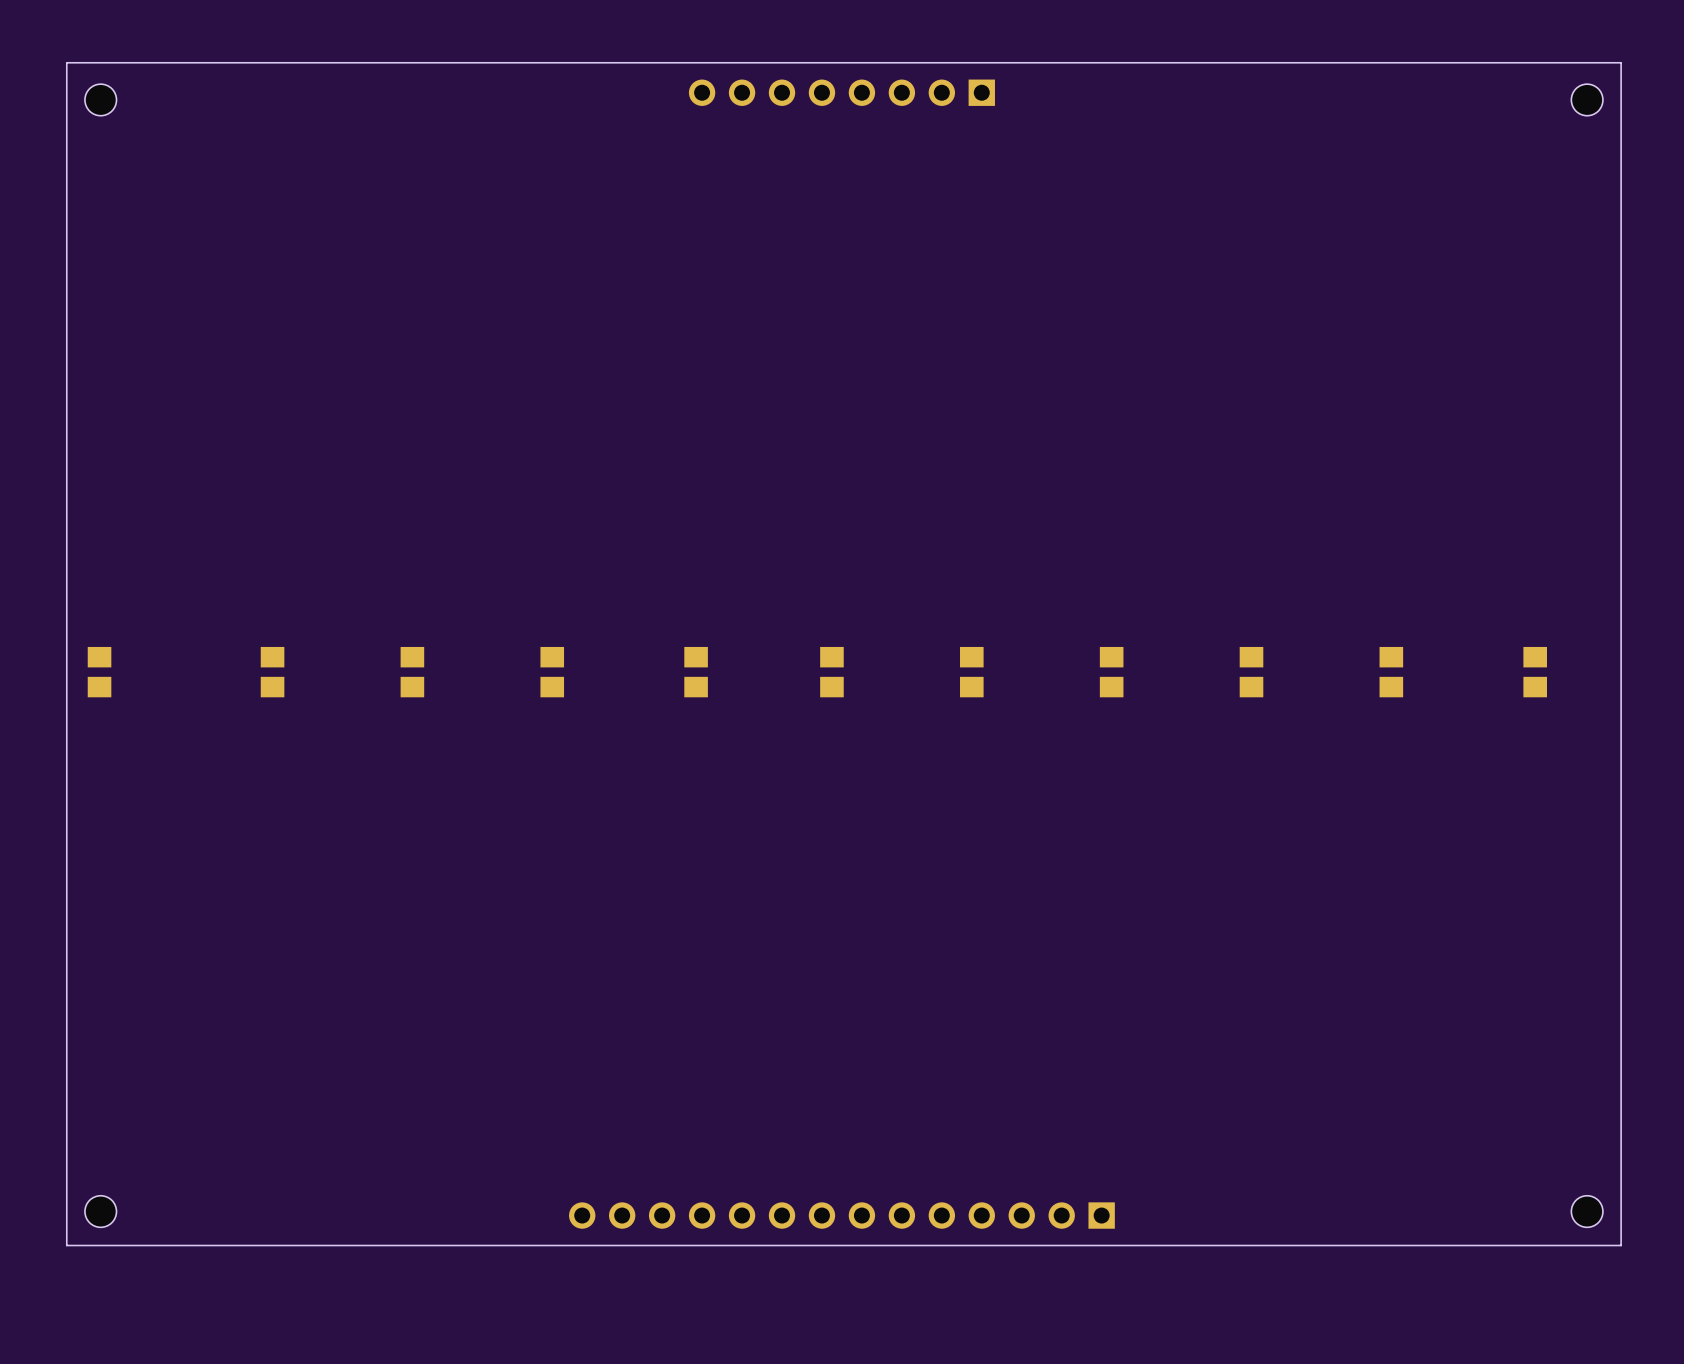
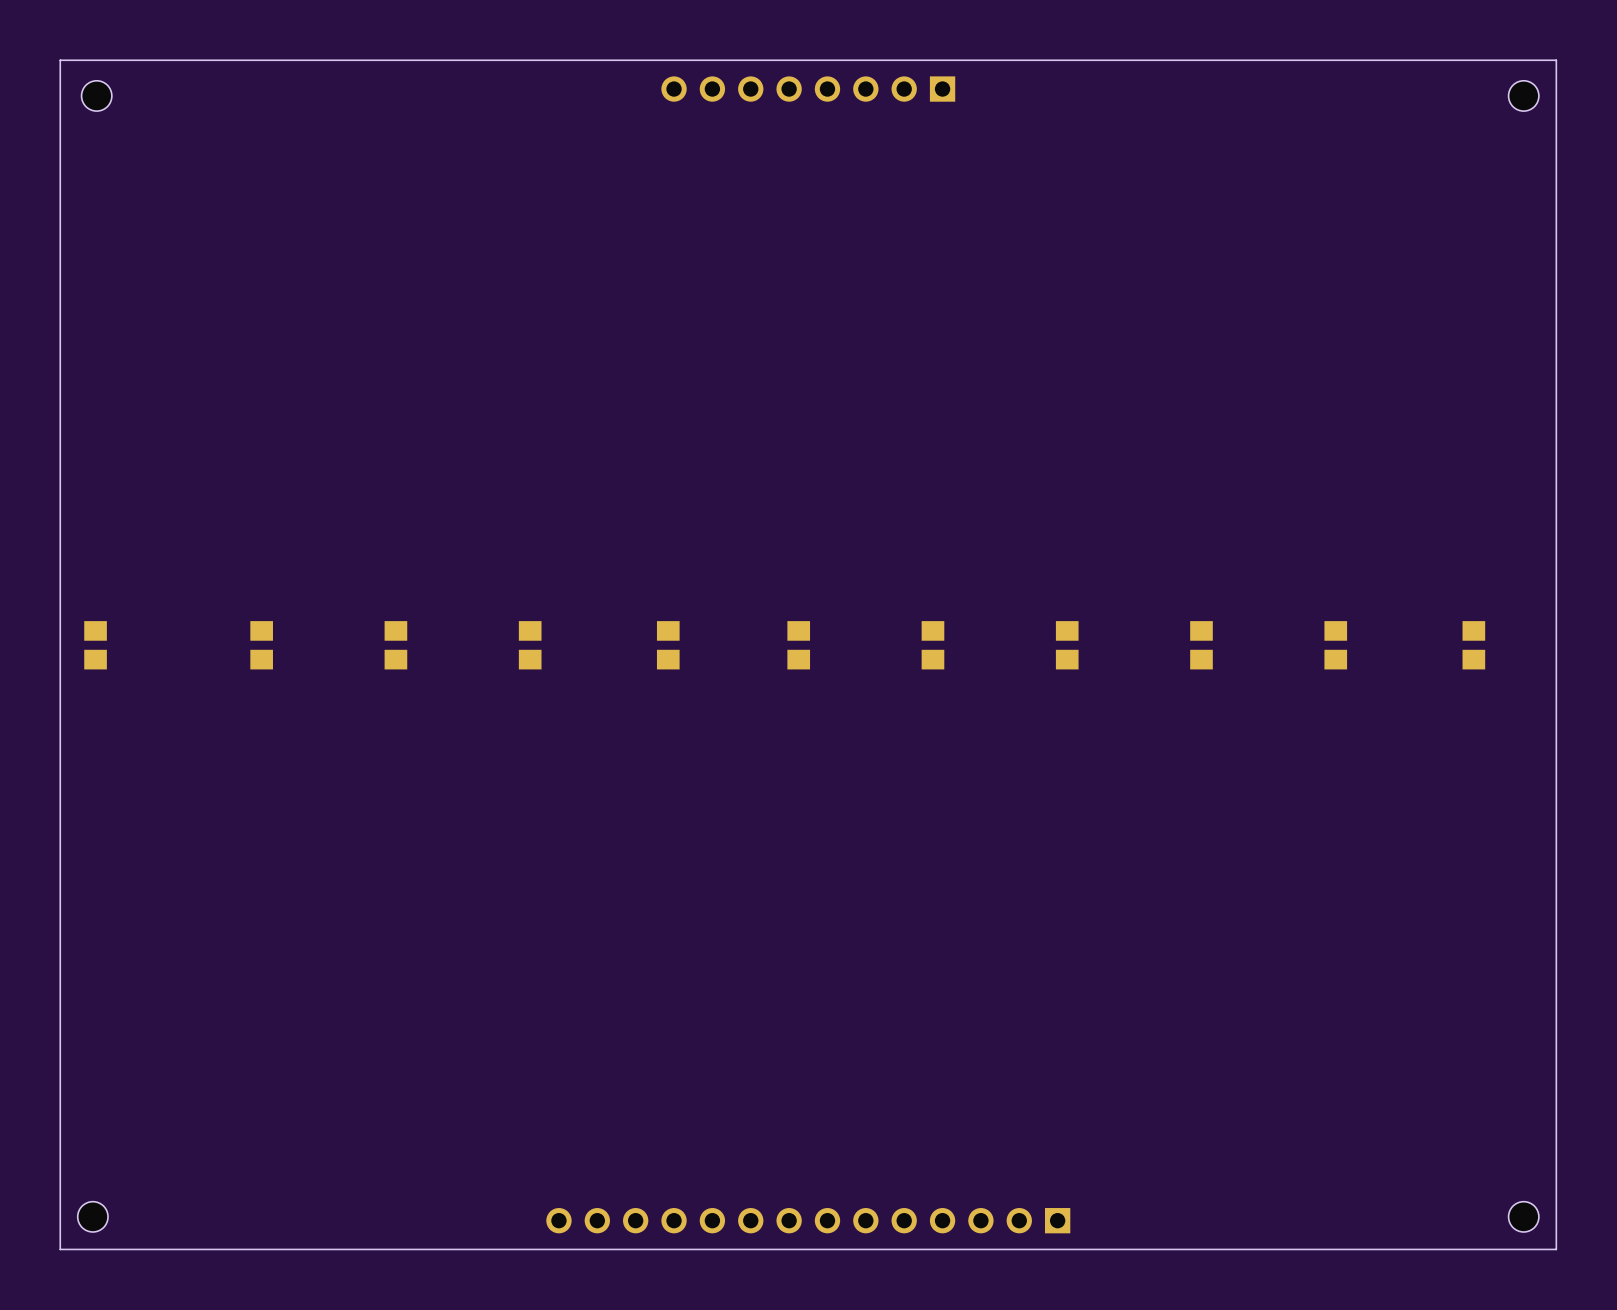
board edge: (66, 62) (66, 1245) (1621, 1245) -> (64, 60) (60, 60) (60, 1249) (1556, 1249) (1556, 1195)
hole position: (100, 1211) -> (92, 1216)
hole position: (1587, 1211) -> (1523, 1216)
part position: (841, 1215) -> (808, 1220)

